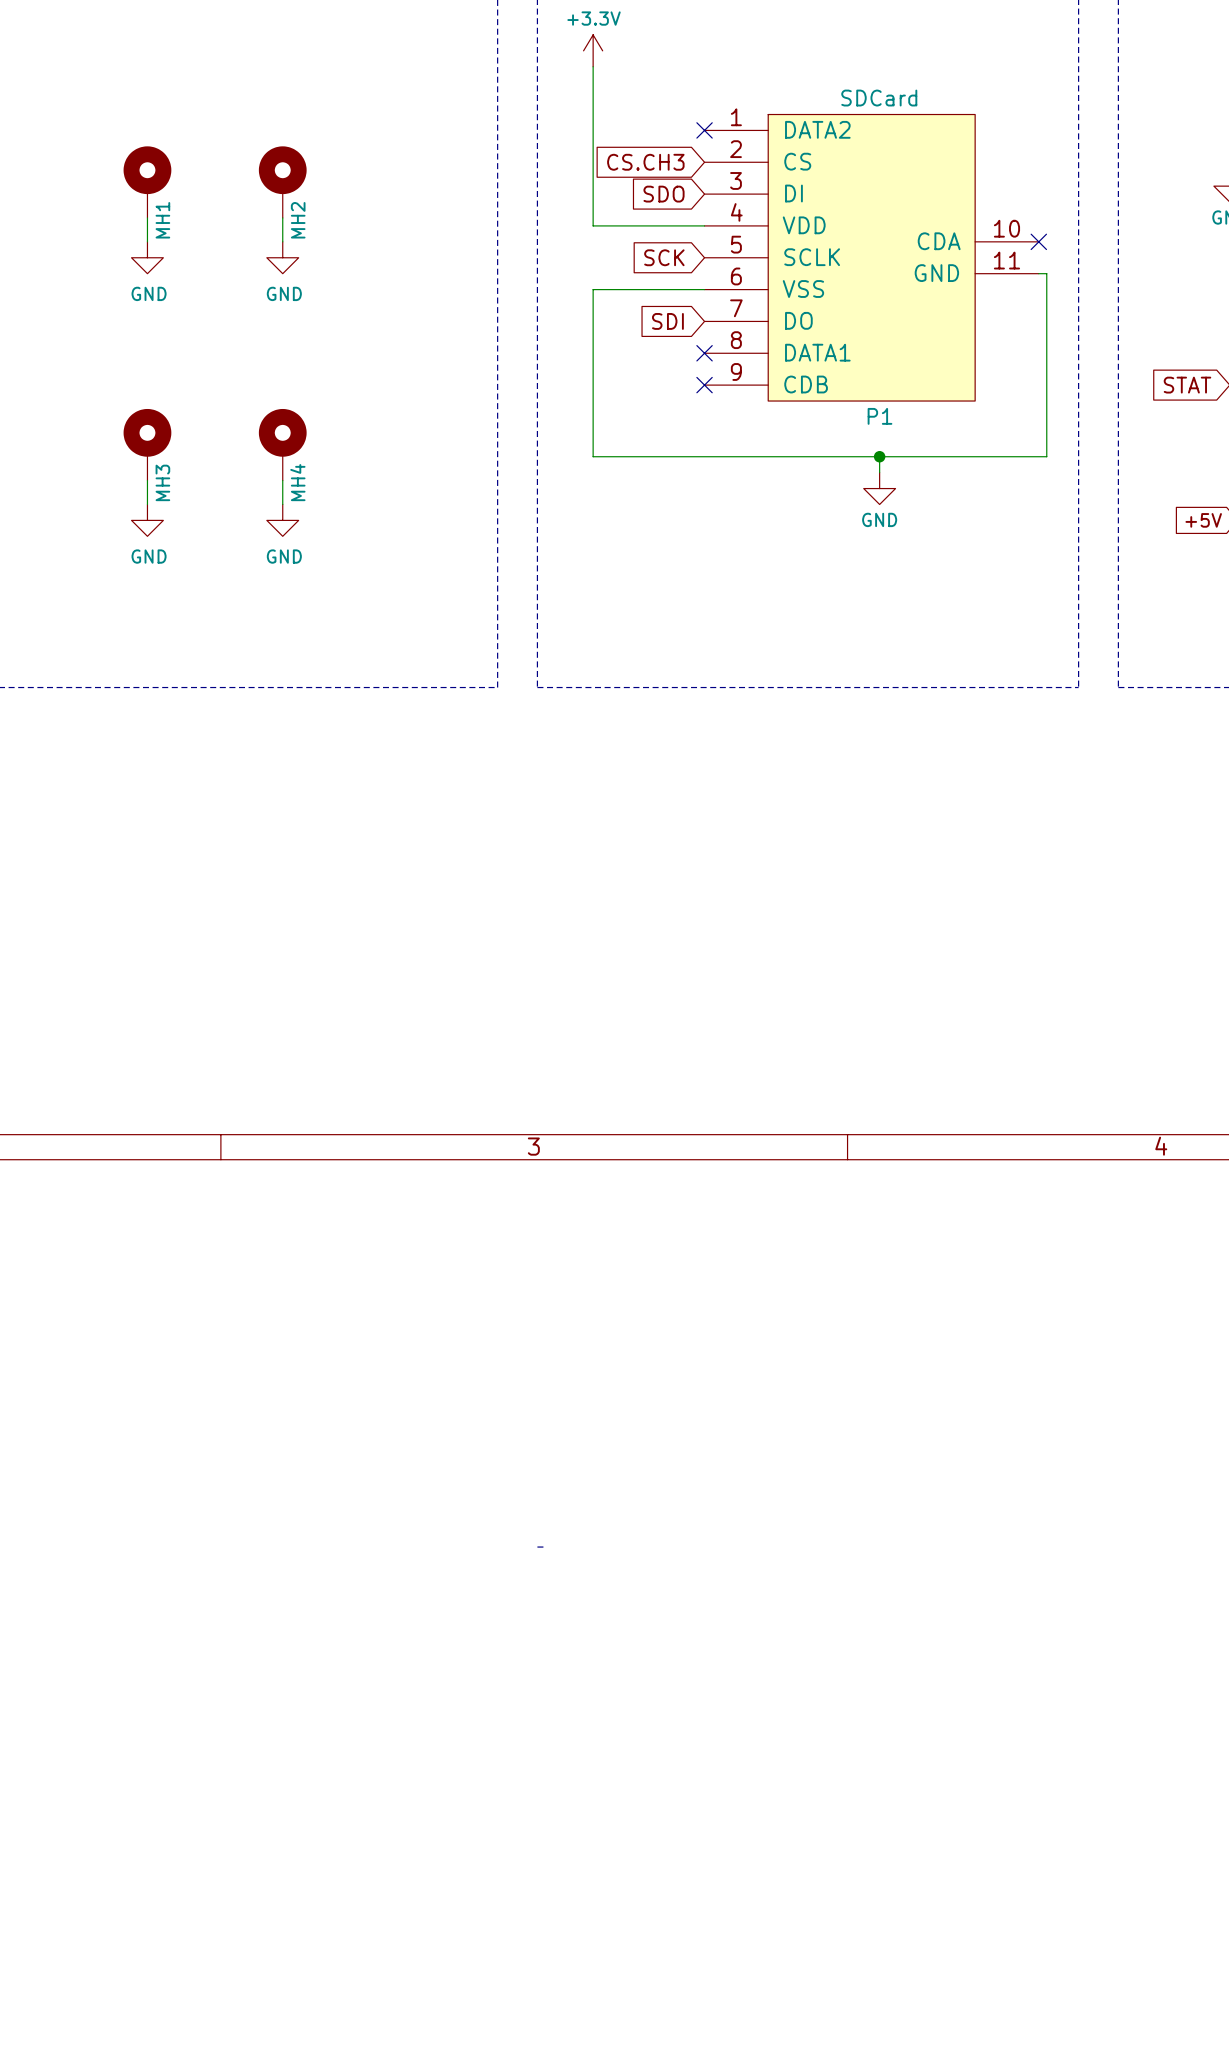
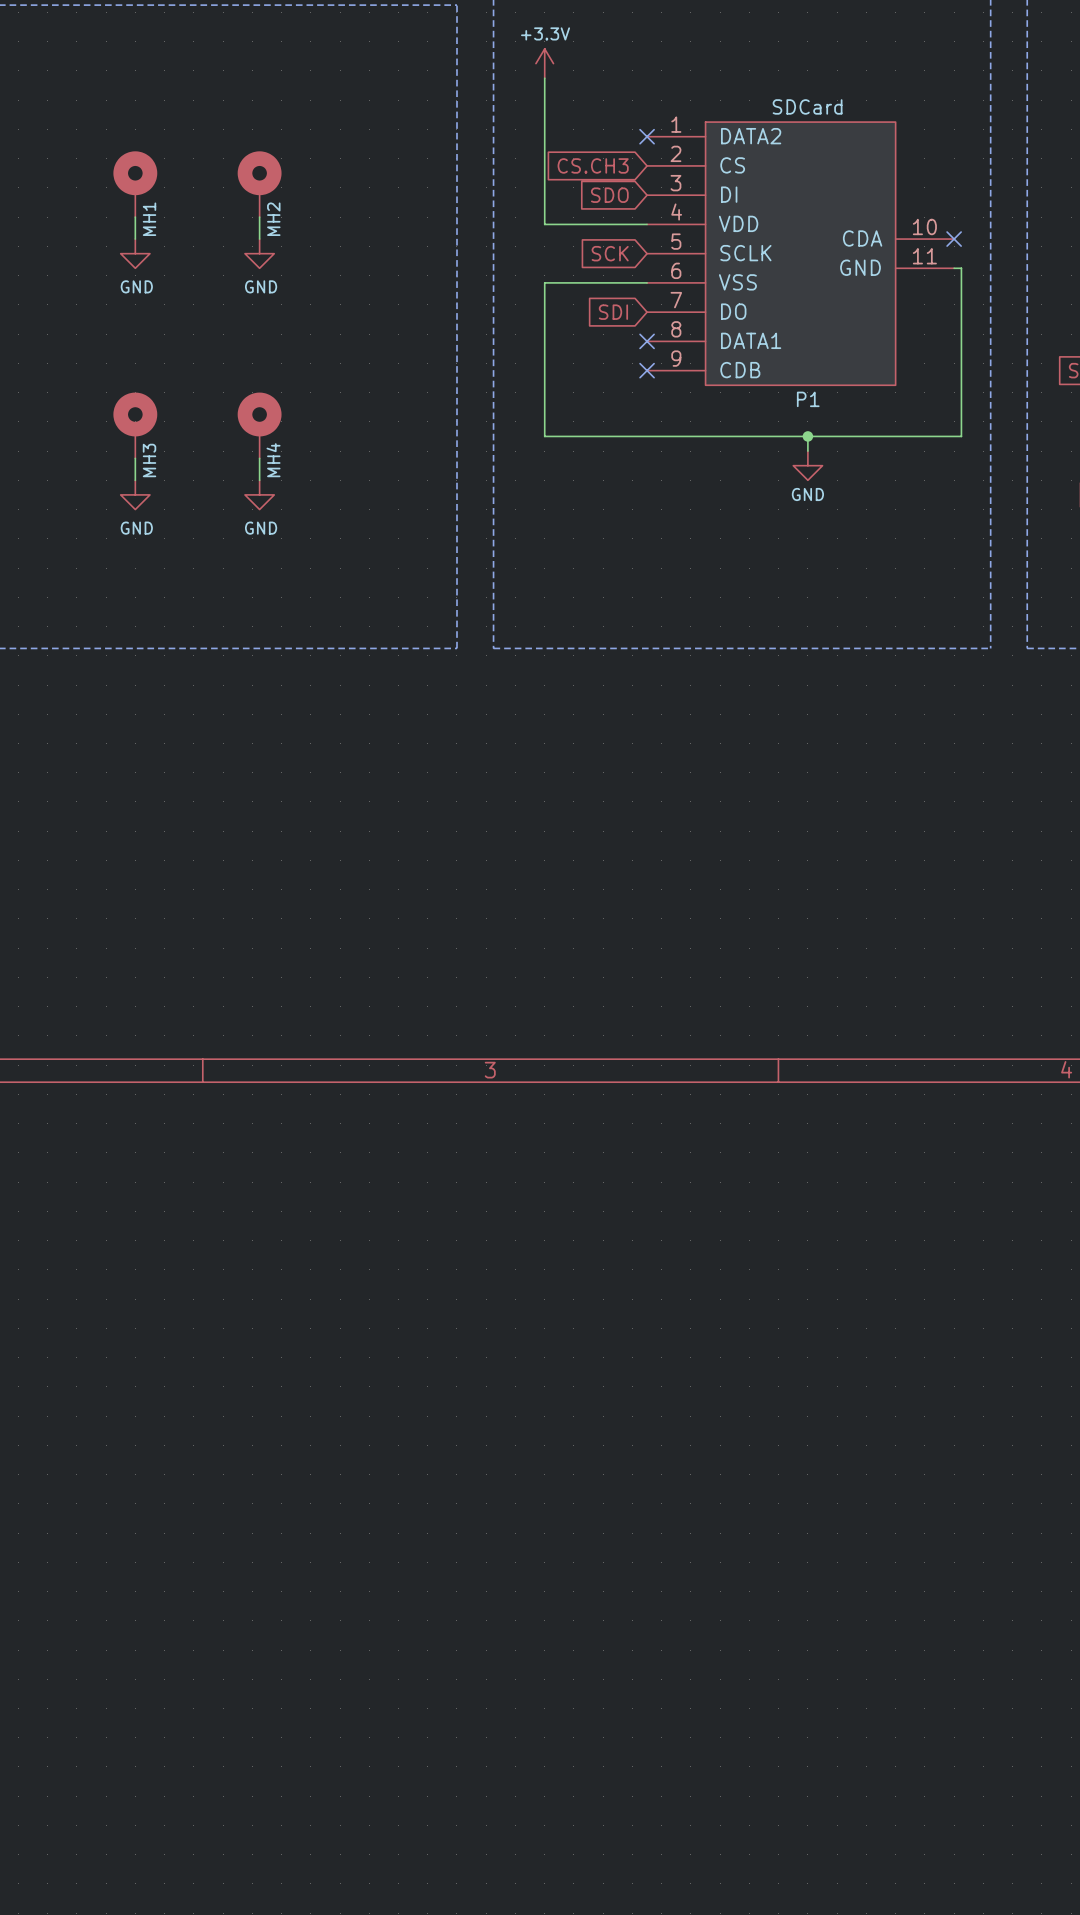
line: (537, 1547) (545, 1547) -> none

